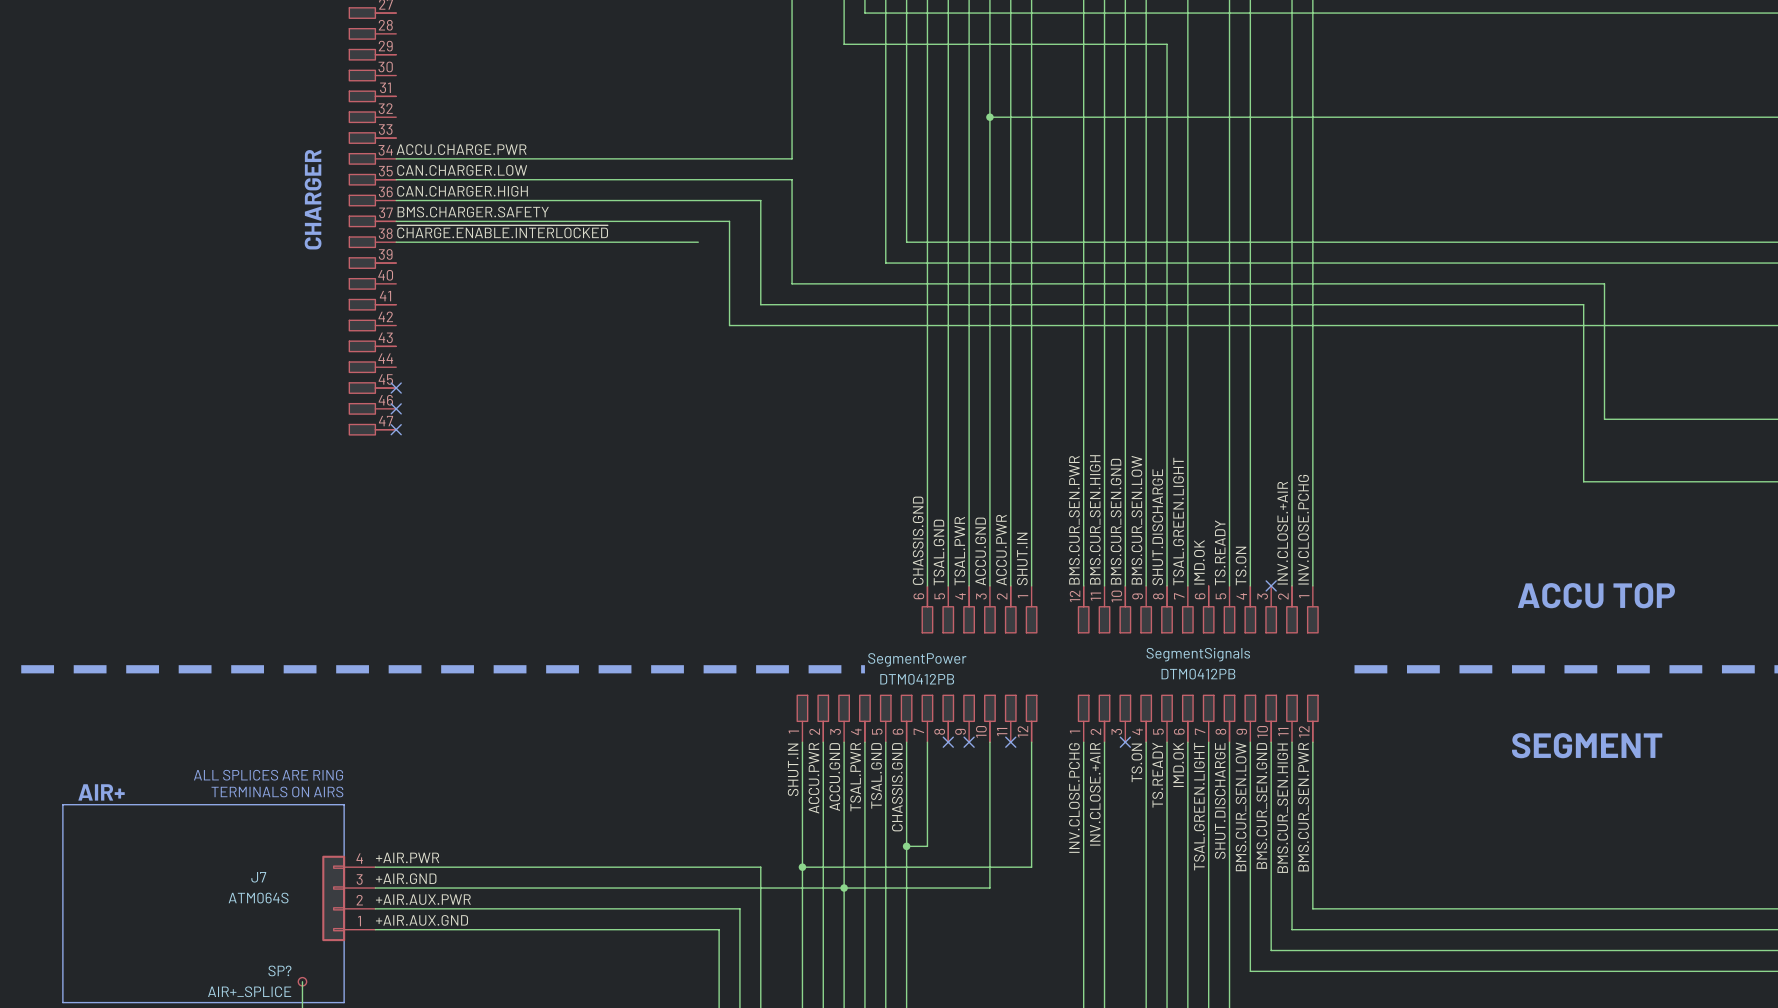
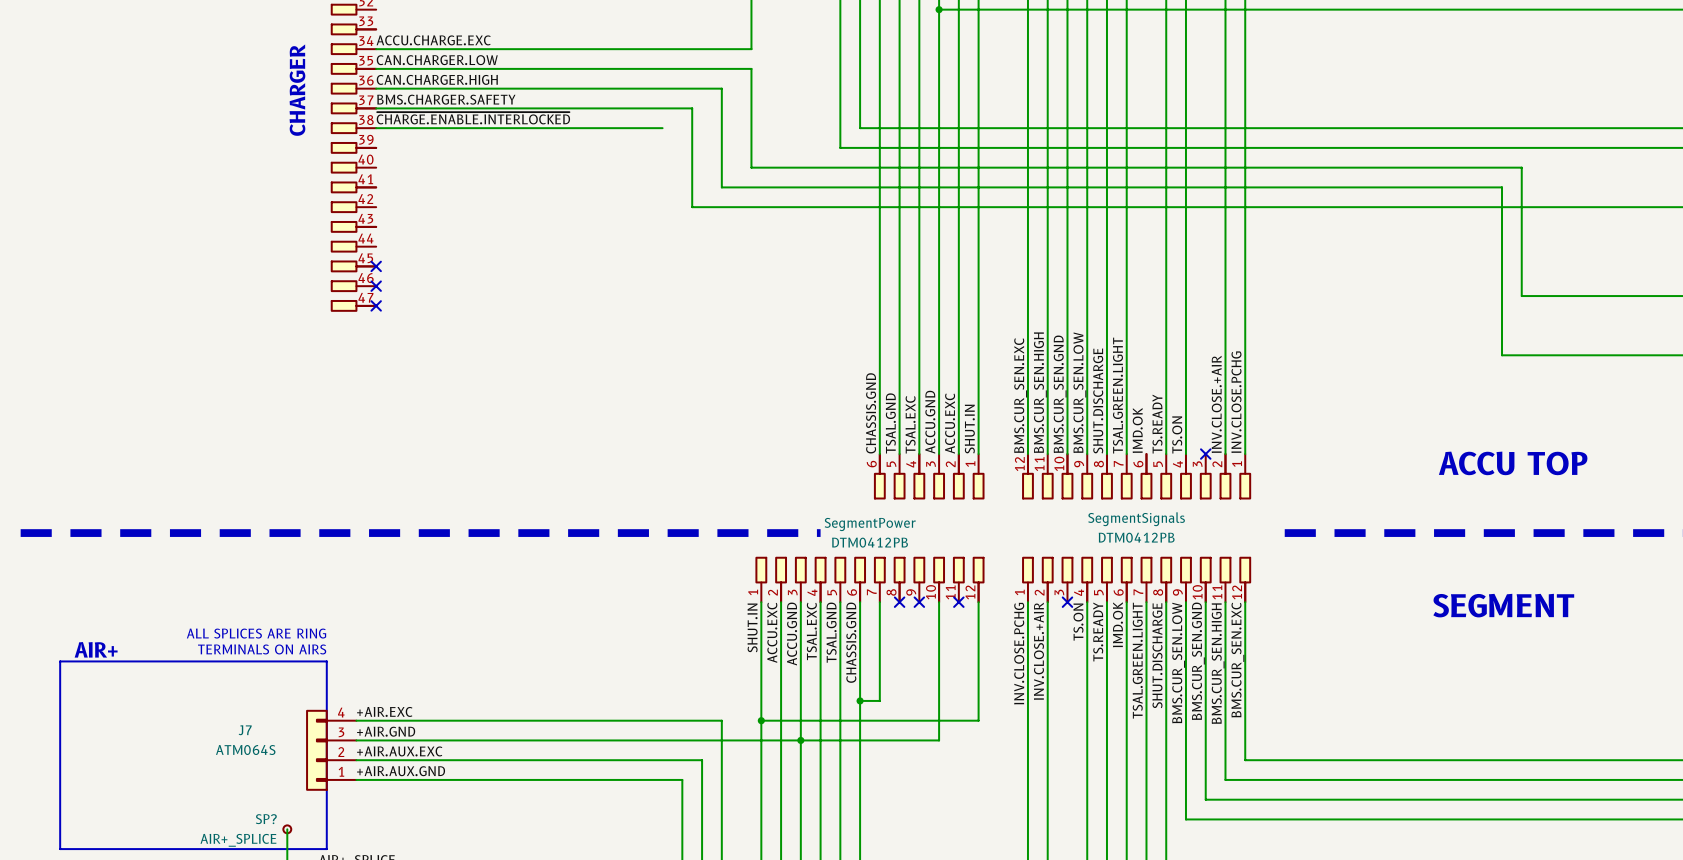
label: ACCU.CHARGE.PWR (461, 149) -> ACCU.CHARGE.EXC (433, 40)
label: BMS.CUR_SEN.PWR (1074, 520) -> BMS.CUR_SEN.EXC (1020, 395)
label: ACCU.PWR (1001, 550) -> ACCU.EXC (950, 423)
label: TSAL.PWR (959, 551) -> TSAL.EXC (910, 424)
label: TSAL.PWR (855, 777) -> TSAL.EXC (811, 631)
label: ACCU.PWR (813, 778) -> ACCU.EXC (772, 632)
label: BMS.CUR_SEN.PWR (1303, 807) -> BMS.CUR_SEN.EXC (1237, 660)
label: +AIR.PWR (407, 857) -> +AIR.EXC (384, 711)
label: +AIR.AUX.PWR (423, 899) -> +AIR.AUX.EXC (399, 751)

